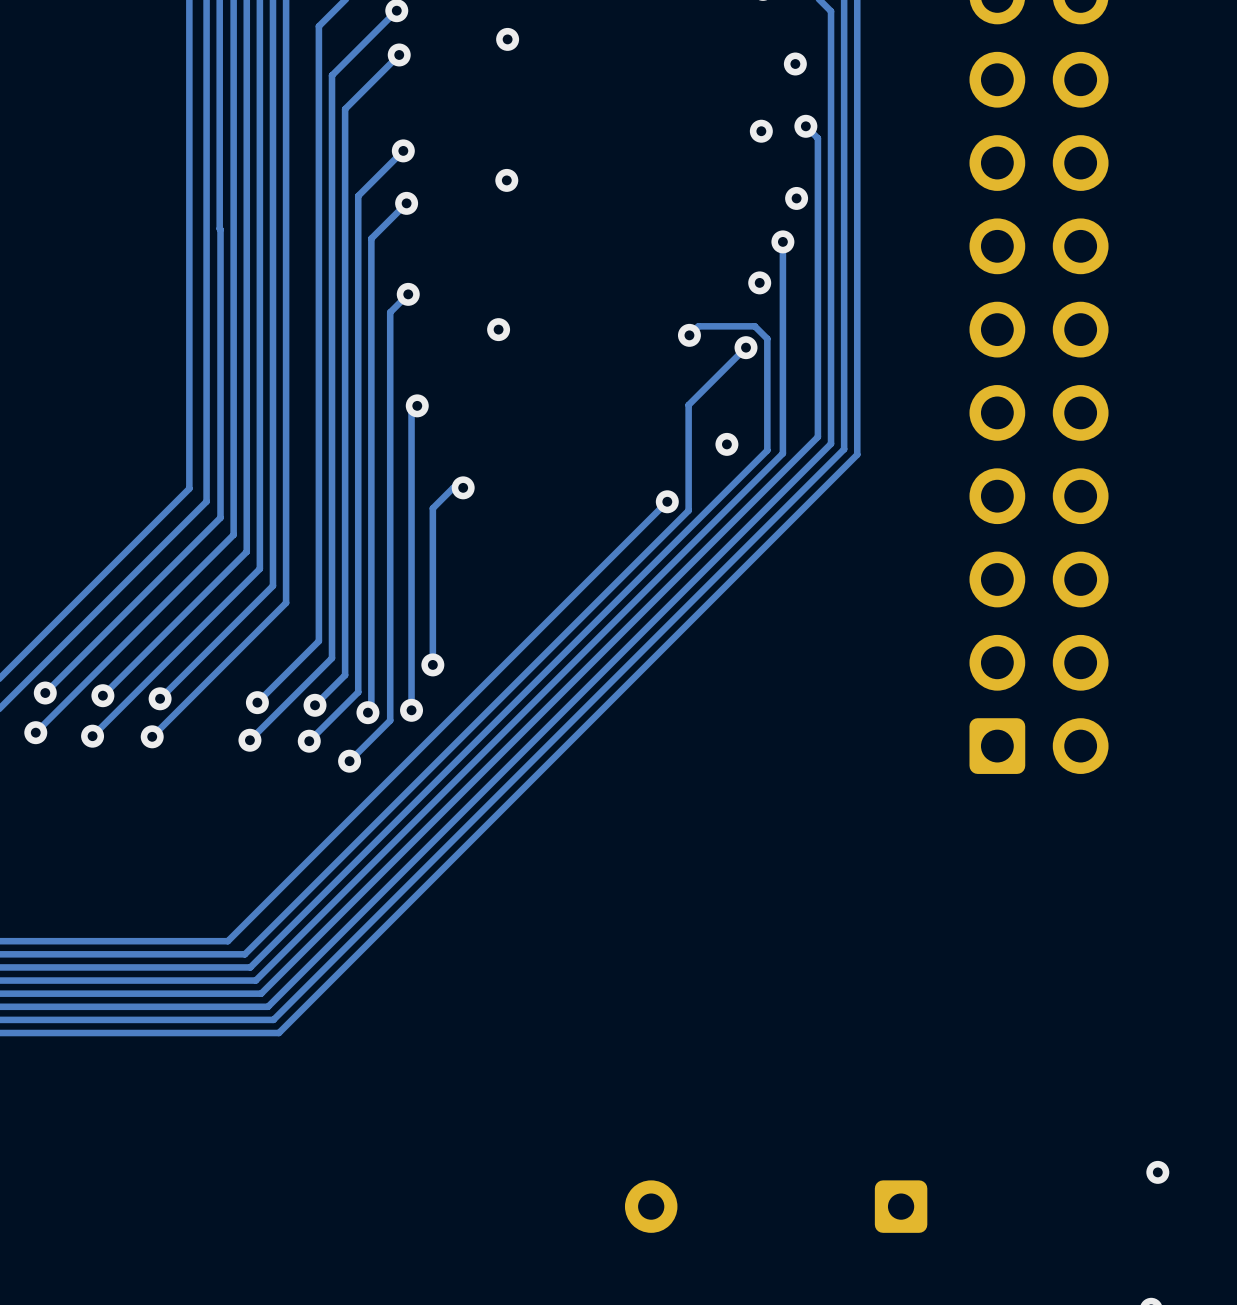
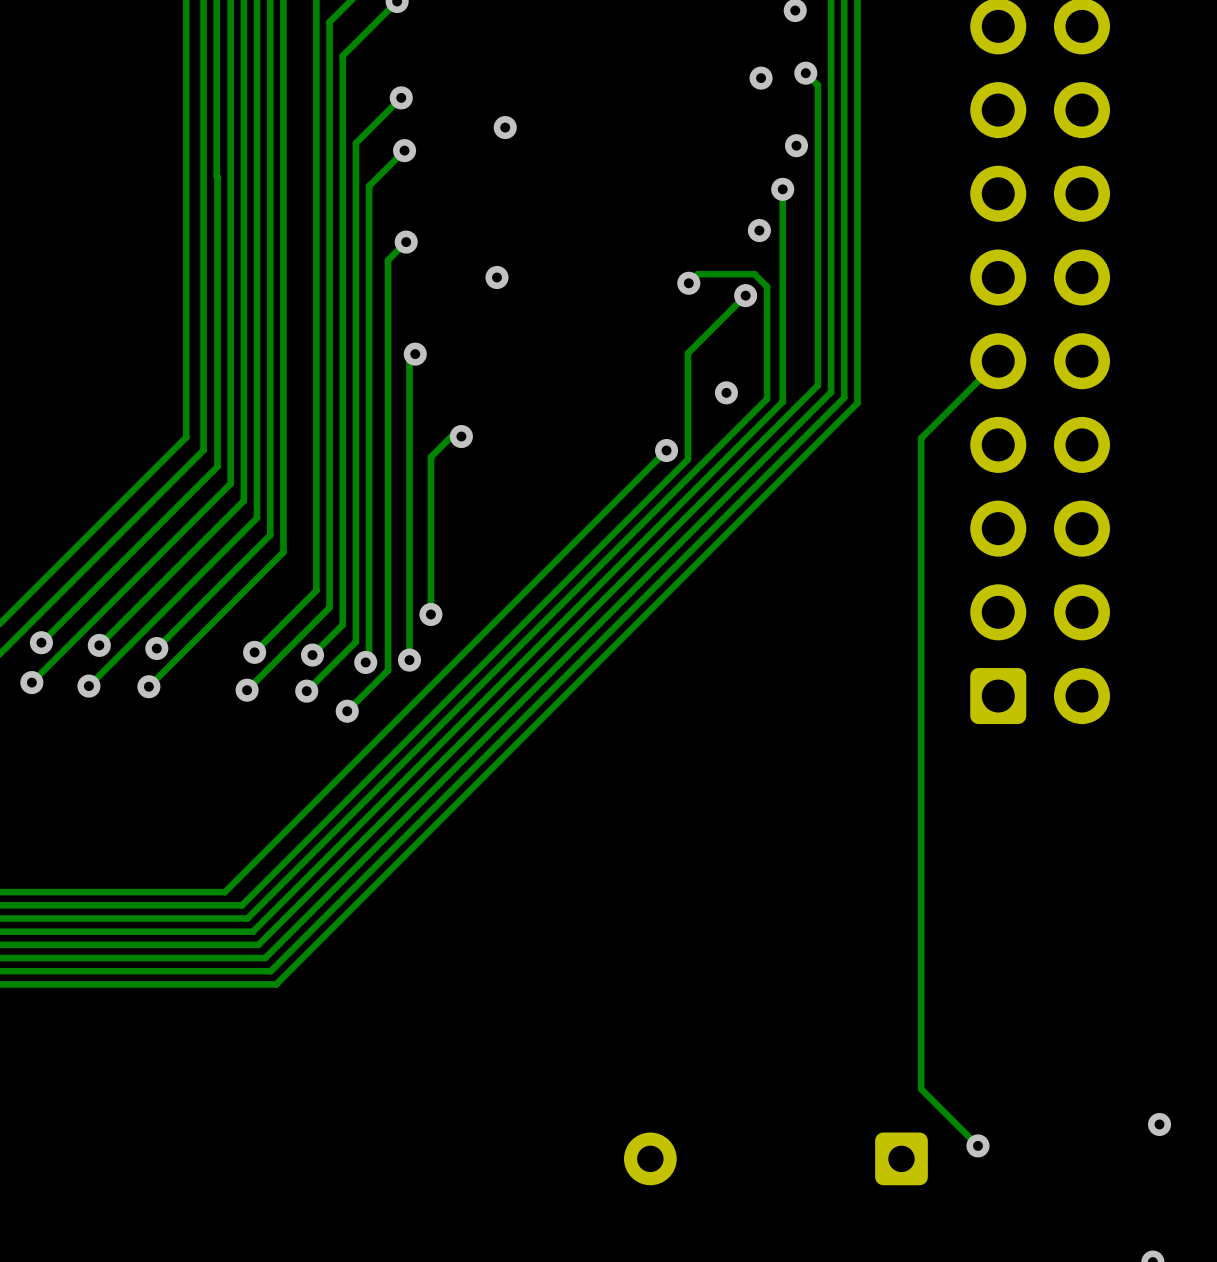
track: none -> (998, 361) (921, 438) (921, 1089) (977, 1145)
via: none -> (977, 1145)

